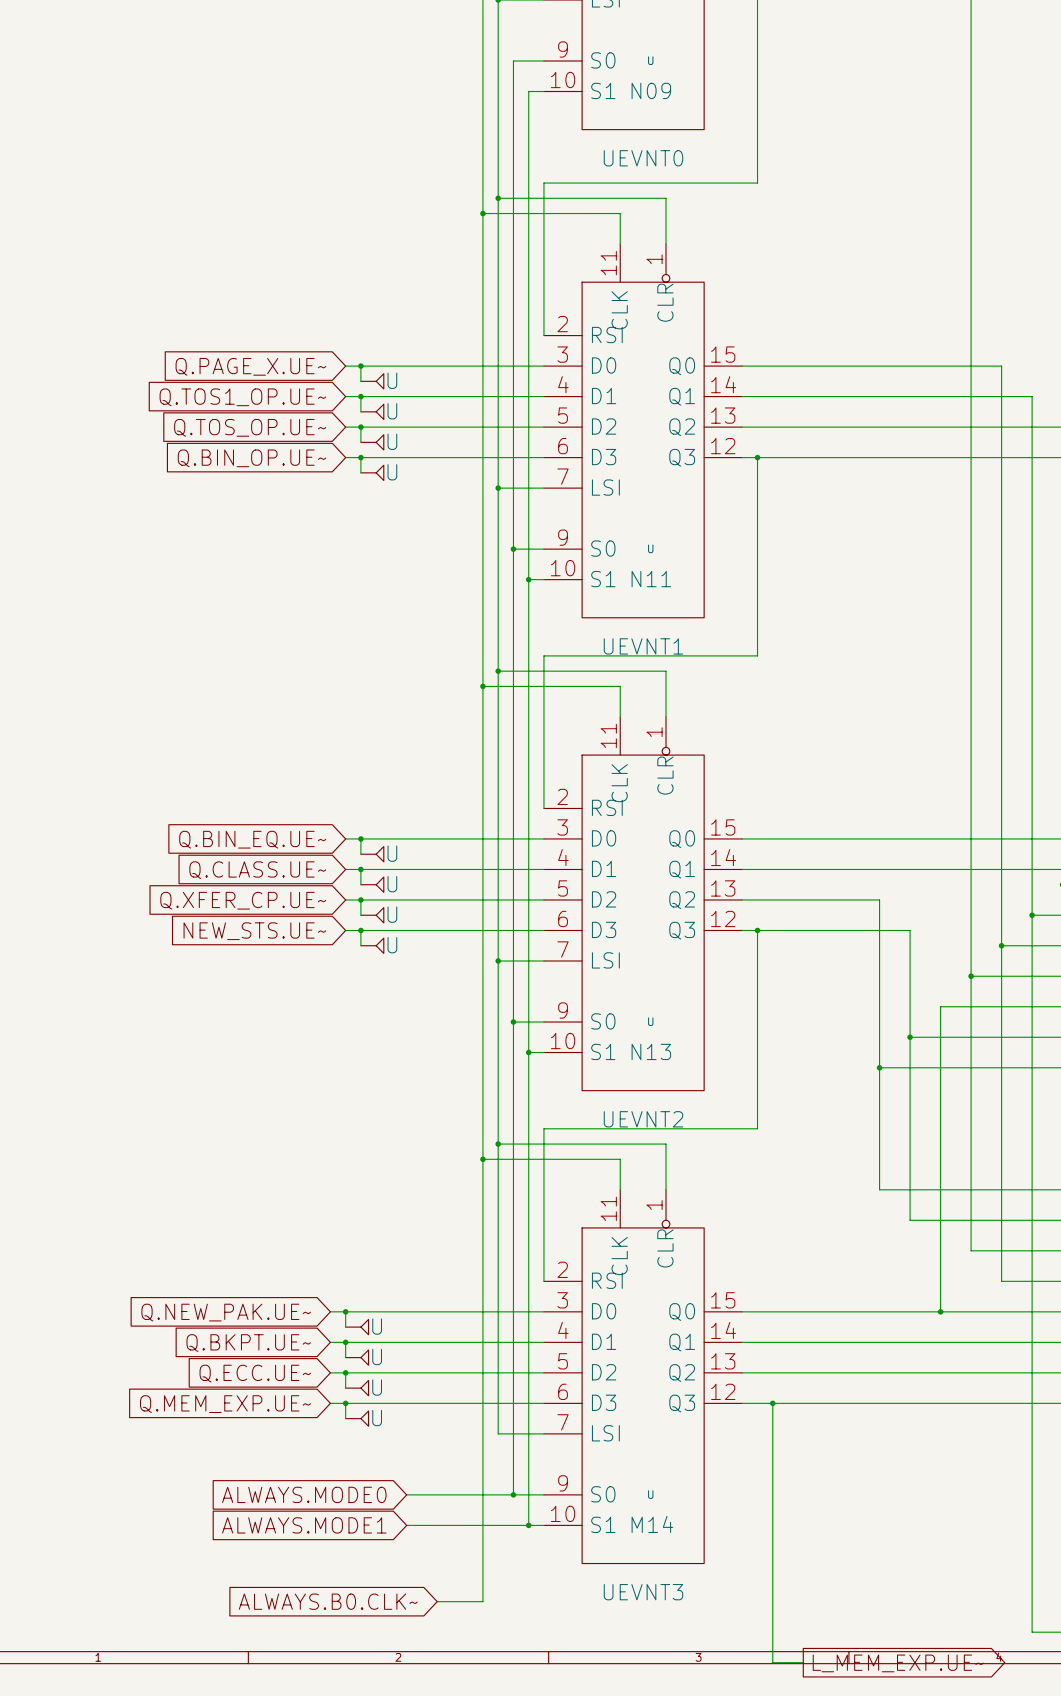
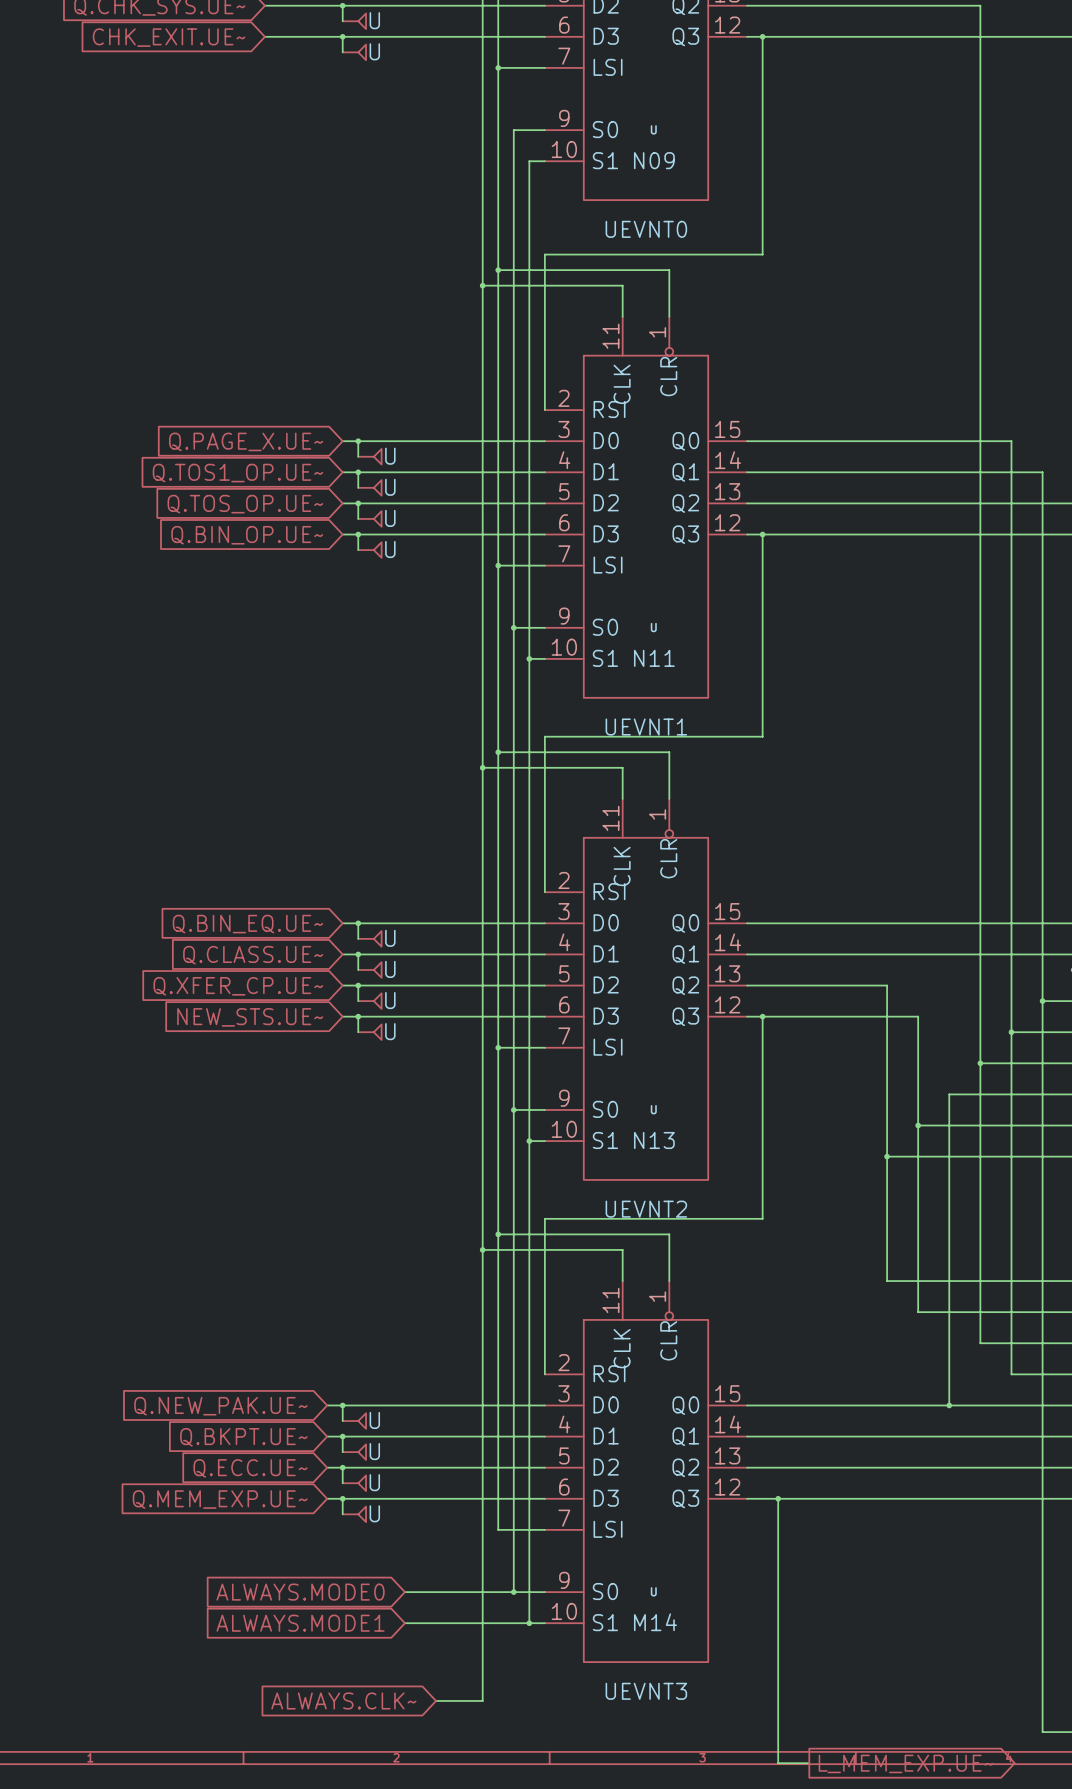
global label: ALWAYS.B0.CLK~ (328, 1601) -> ALWAYS.CLK~ (343, 1700)

